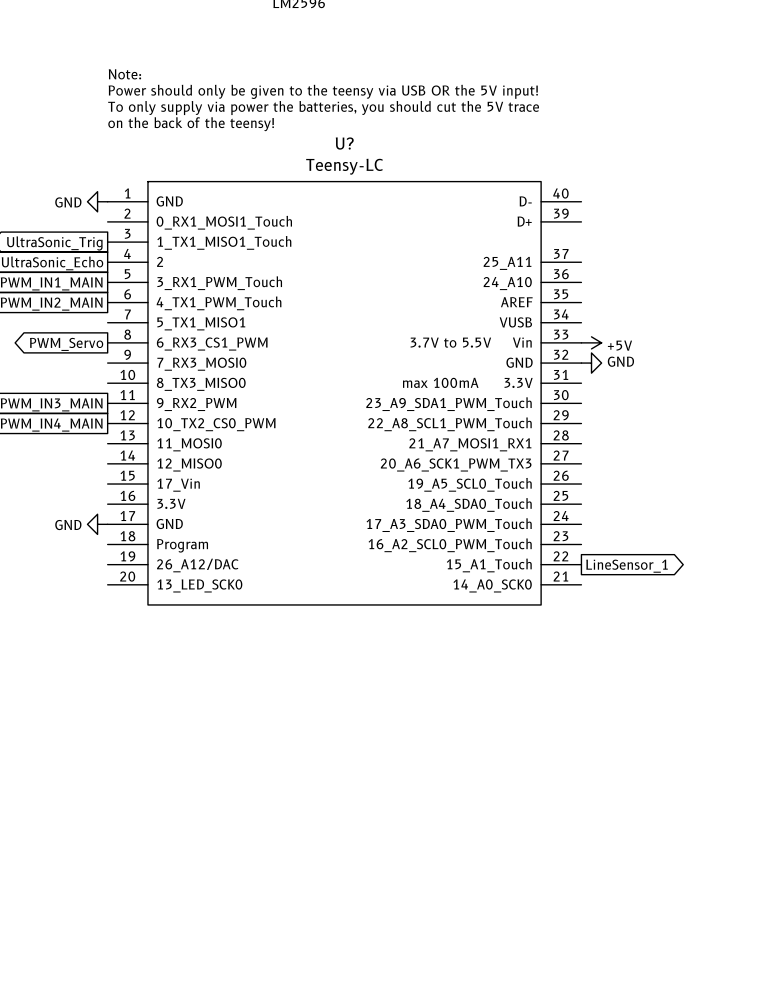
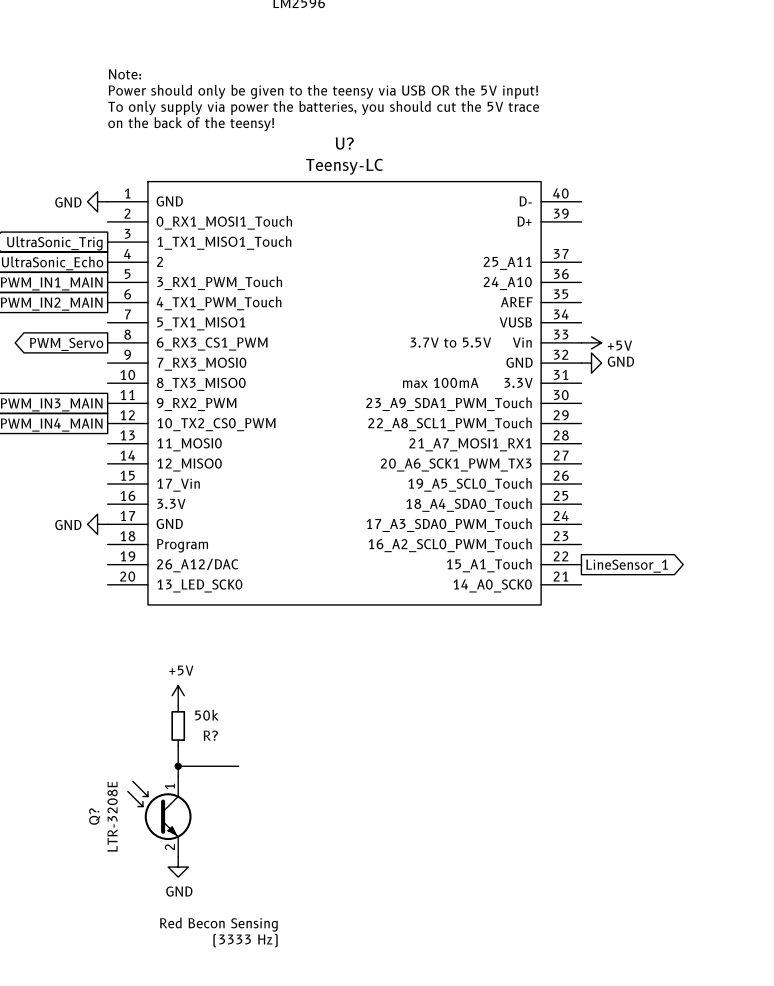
power symbol: none -> +5V (178, 695)
R?: none -> 50k (178, 725)
wire: none -> (178, 746) (178, 776)
wire: none -> (178, 766) (238, 766)
junction: none -> (178, 766)
Q?: none -> LTR-3208E (159, 816)
power symbol: none -> GND (178, 867)
text: none -> Red Becon Sensing (218, 924)
text: none -> (3333 Hz) (245, 940)

